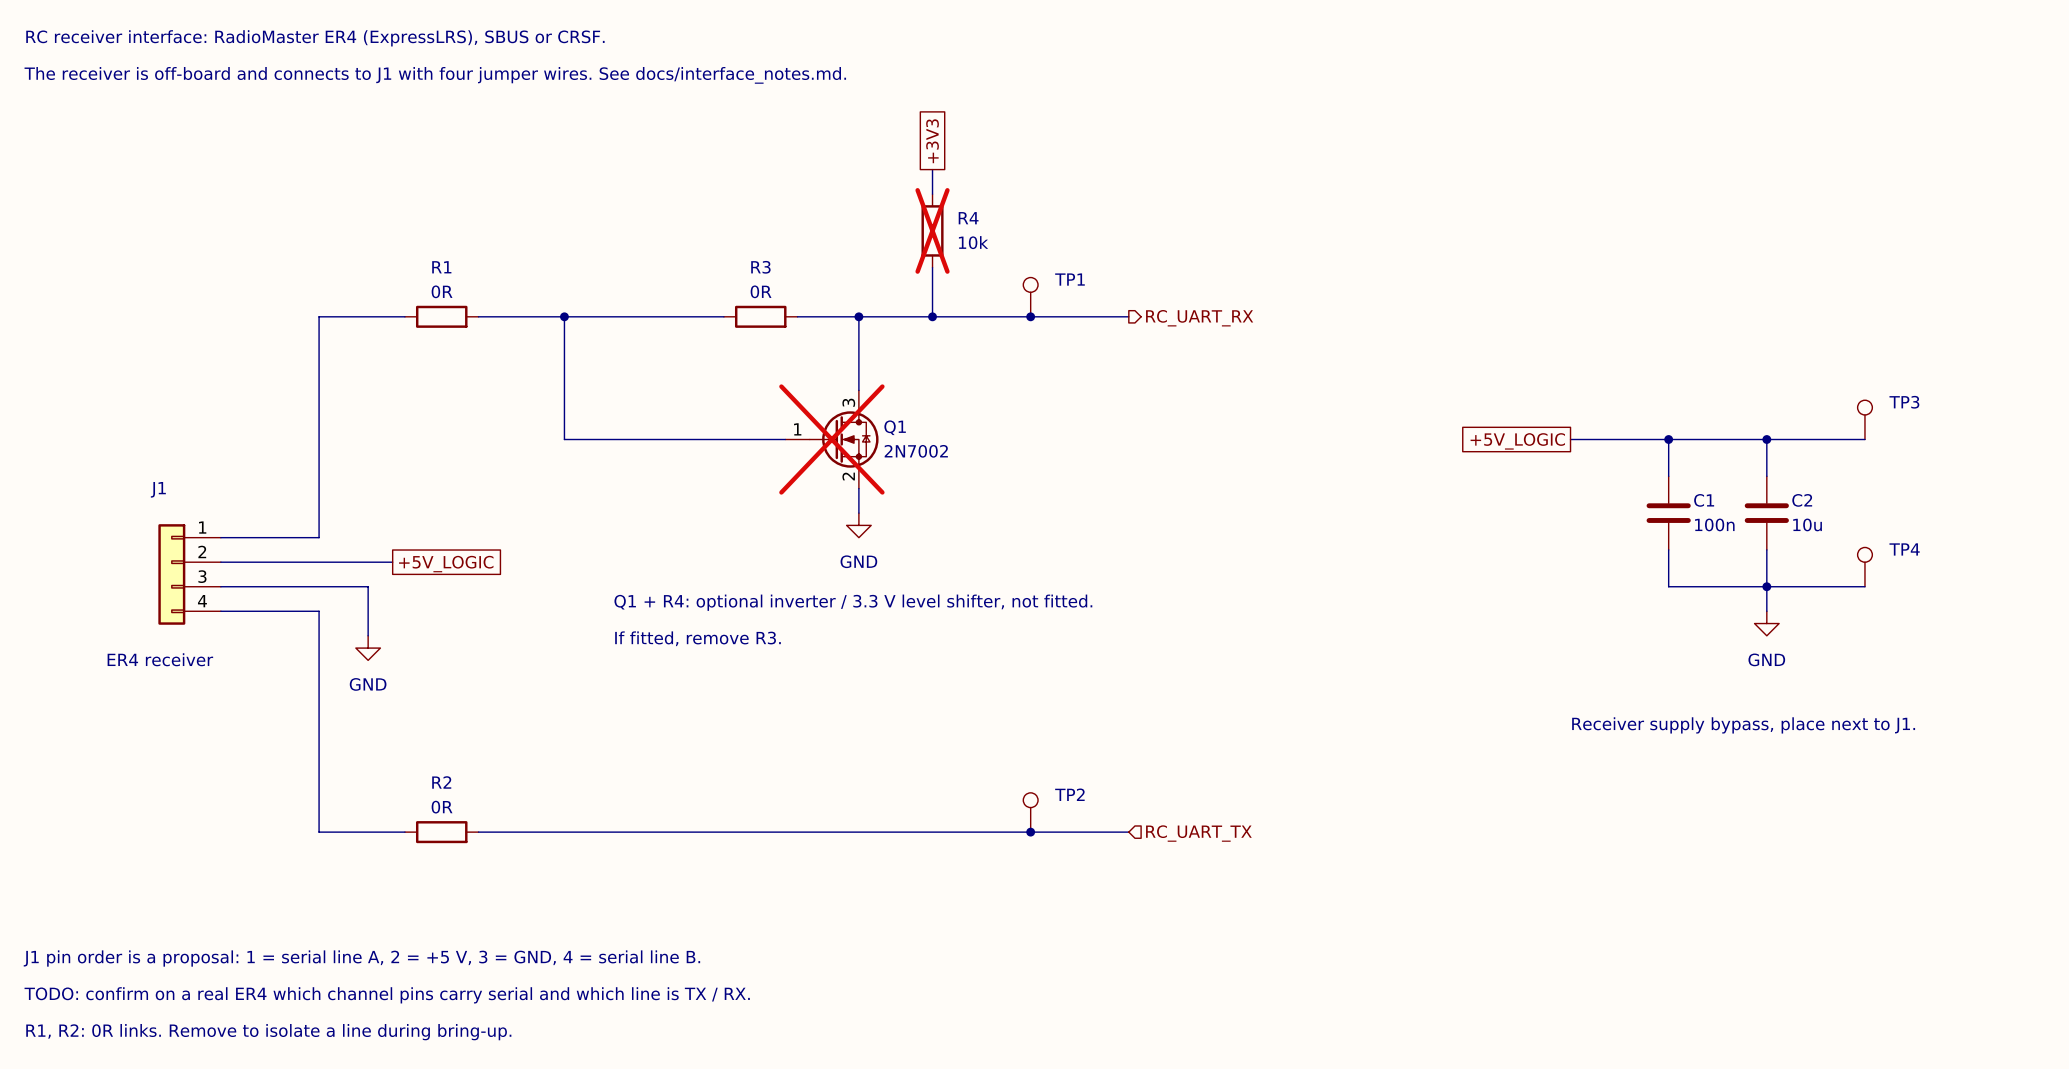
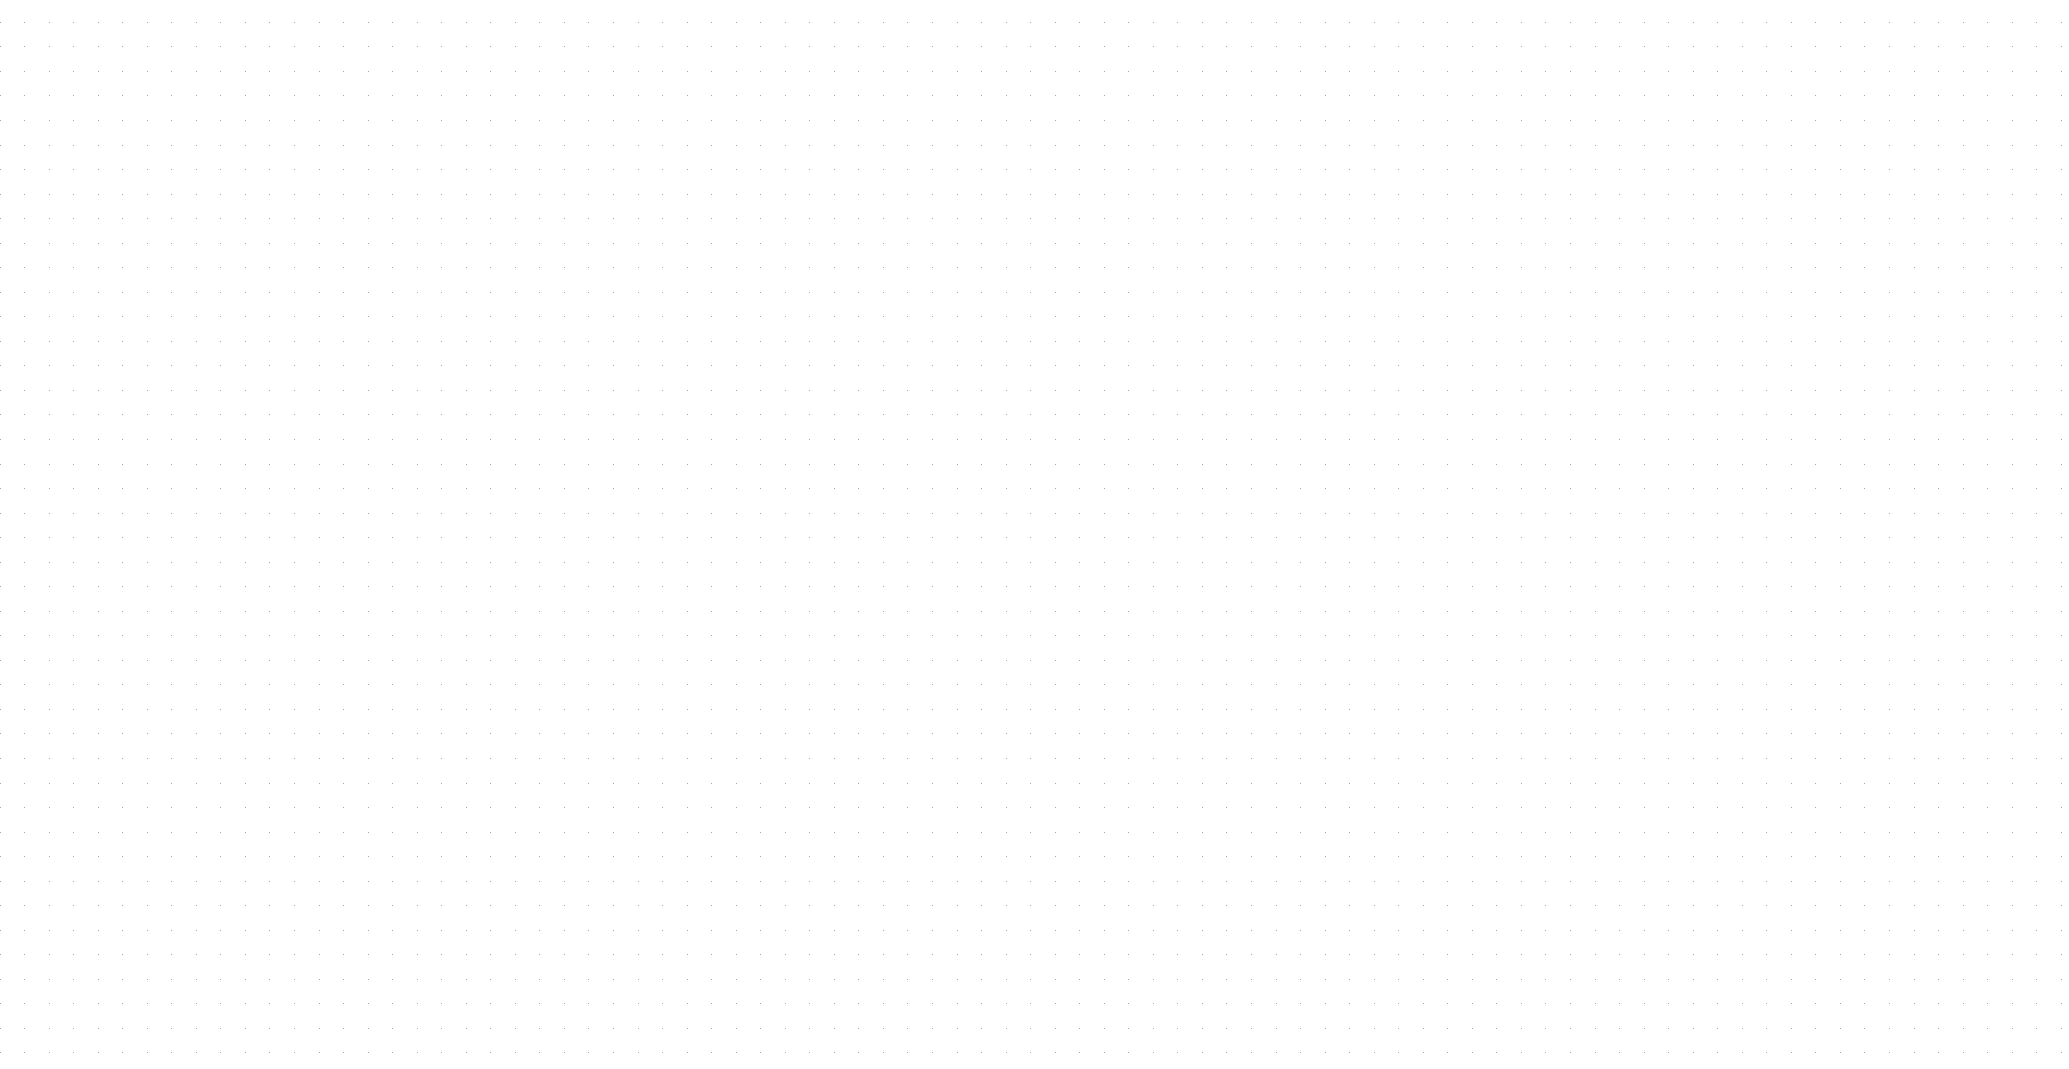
text: RC receiver interface: RadioMaster ER4 (ExpressLRS), SBUS or CRSF. (315, 38) -> none
text: The receiver is off-board and connects to J1 with four jumper wires. See docs/interface_notes.md. (435, 75) -> none
global label: +3V3 (932, 141) -> none
wire: (932, 169) (932, 194) -> none
R4: 10k (932, 230) -> none
wire: (932, 267) (932, 316) -> none
TP1: (1030, 297) -> none
wire: (404, 316) (319, 316) (319, 537) (220, 537) -> none
R1: 0R (441, 316) -> none
wire: (478, 316) (723, 316) -> none
wire: (564, 316) (564, 439) (785, 439) -> none
junction: (564, 316) -> none
R3: 0R (760, 316) -> none
wire: (797, 316) (1128, 316) -> none
wire: (858, 316) (858, 390) -> none
junction: (858, 316) -> none
junction: (932, 316) -> none
junction: (1030, 316) -> none
hierarchical label: RC_UART_RX (1199, 318) -> none
TP3: (1864, 419) -> none
Q1: 2N7002 (831, 439) -> none
wire: (1570, 439) (1864, 439) -> none
wire: (1668, 439) (1668, 476) -> none
junction: (1668, 439) -> none
wire: (1766, 439) (1766, 476) -> none
junction: (1766, 439) -> none
global label: +5V_LOGIC (1517, 441) -> none
wire: (858, 488) (858, 513) -> none
C1: 100n (1668, 513) -> none
C2: 10u (1766, 513) -> none
power symbol: GND (858, 525) -> none
wire: (1668, 549) (1668, 586) (1864, 586) -> none
wire: (1766, 549) (1766, 611) -> none
wire: (220, 562) (392, 562) -> none
global label: +5V_LOGIC (446, 564) -> none
TP4: (1864, 567) -> none
J1: ER4 receiver (189, 574) -> none
wire: (220, 586) (368, 586) (368, 635) -> none
junction: (1766, 586) -> none
text: Q1 + R4: optional inverter / 3.3 V level shifter, not fitted. (853, 602) -> none
wire: (220, 611) (319, 611) (319, 832) (404, 832) -> none
power symbol: GND (1766, 623) -> none
text: If fitted, remove R3. (698, 638) -> none
power symbol: GND (368, 648) -> none
text: Receiver supply bypass, place next to J1. (1743, 725) -> none
TP2: (1030, 812) -> none
R2: 0R (441, 832) -> none
wire: (478, 832) (1128, 832) -> none
junction: (1030, 832) -> none
hierarchical label: RC_UART_TX (1198, 833) -> none
text: J1 pin order is a proposal: 1 = serial line A, 2 = +5 V, 3 = GND, 4 = serial line B. (361, 958) -> none
text: TODO: confirm on a real ER4 which channel pins carry serial and which line is TX / RX. (387, 995) -> none
text: R1, R2: 0R links. Remove to isolate a line during bring-up. (268, 1032) -> none

